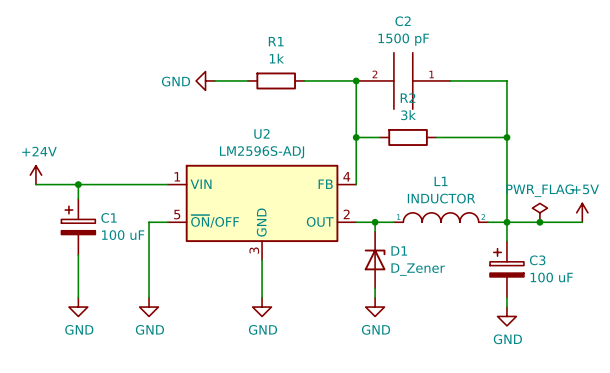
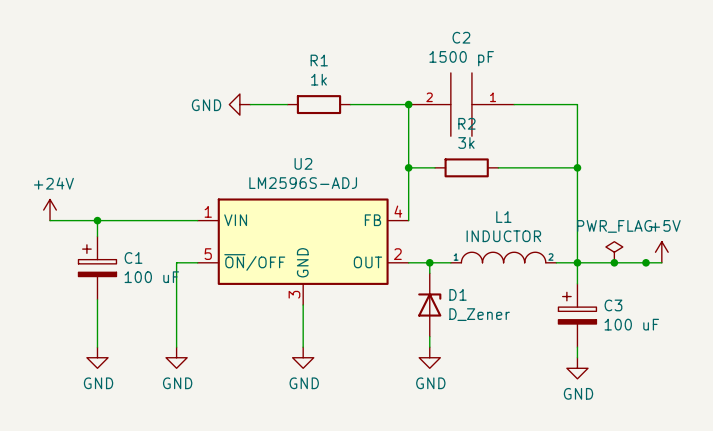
junction: none -> (646, 262)

